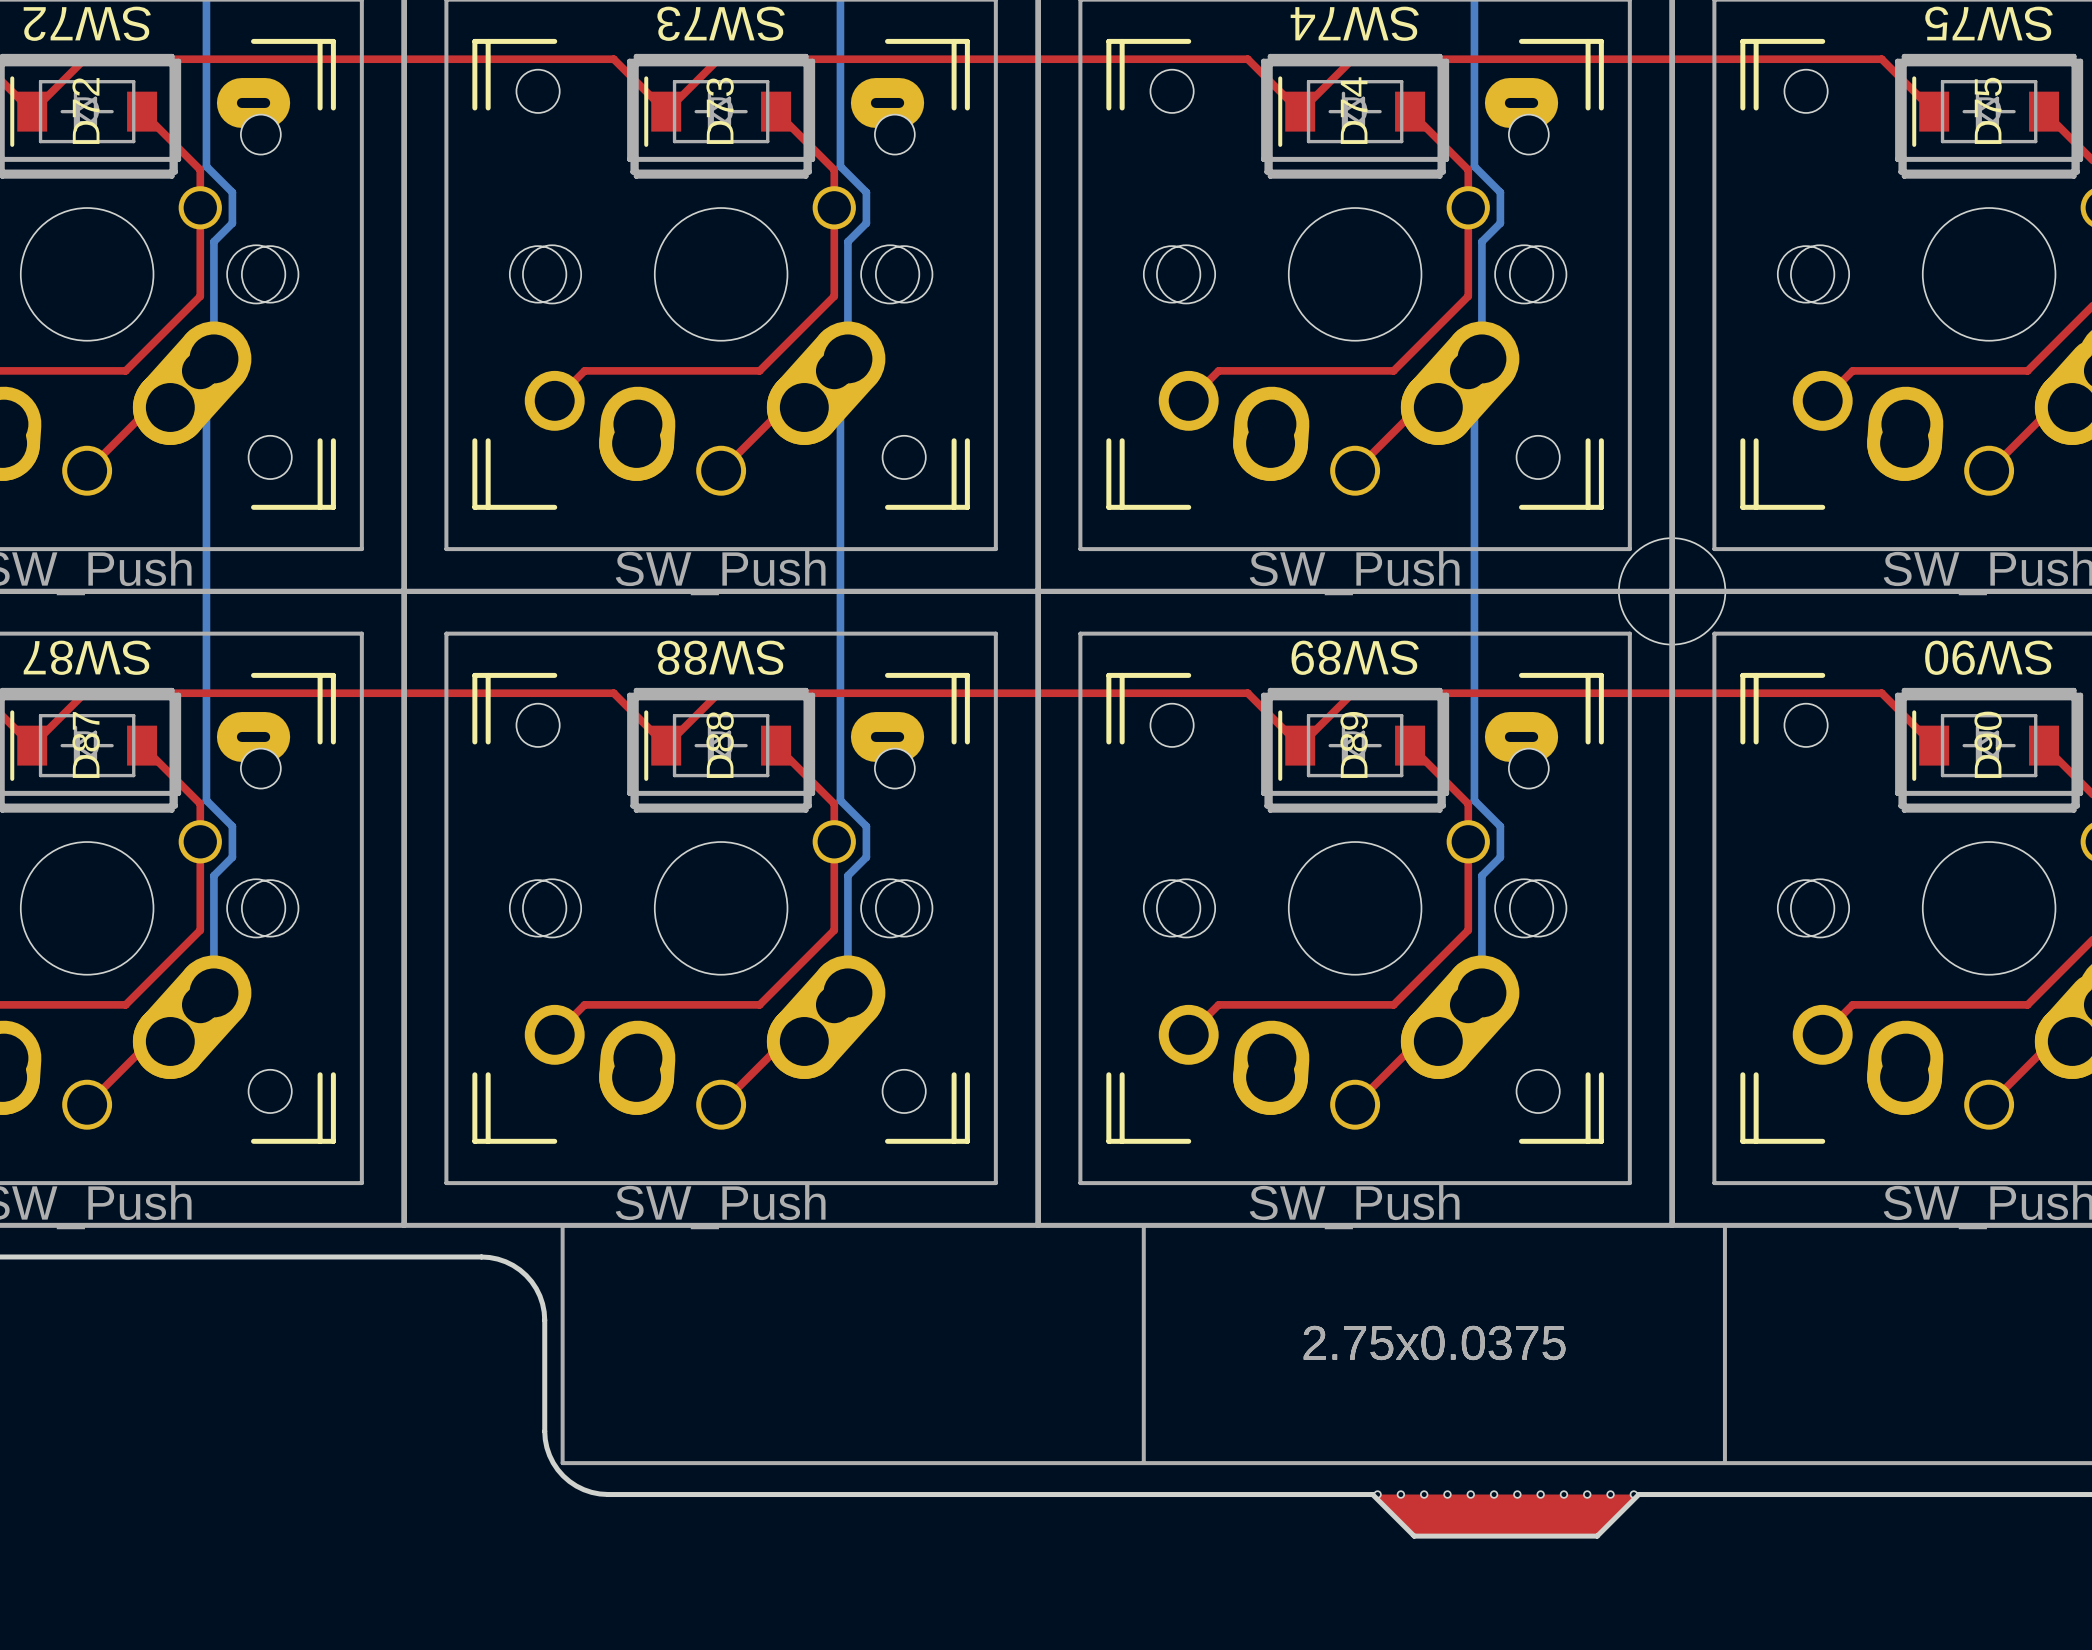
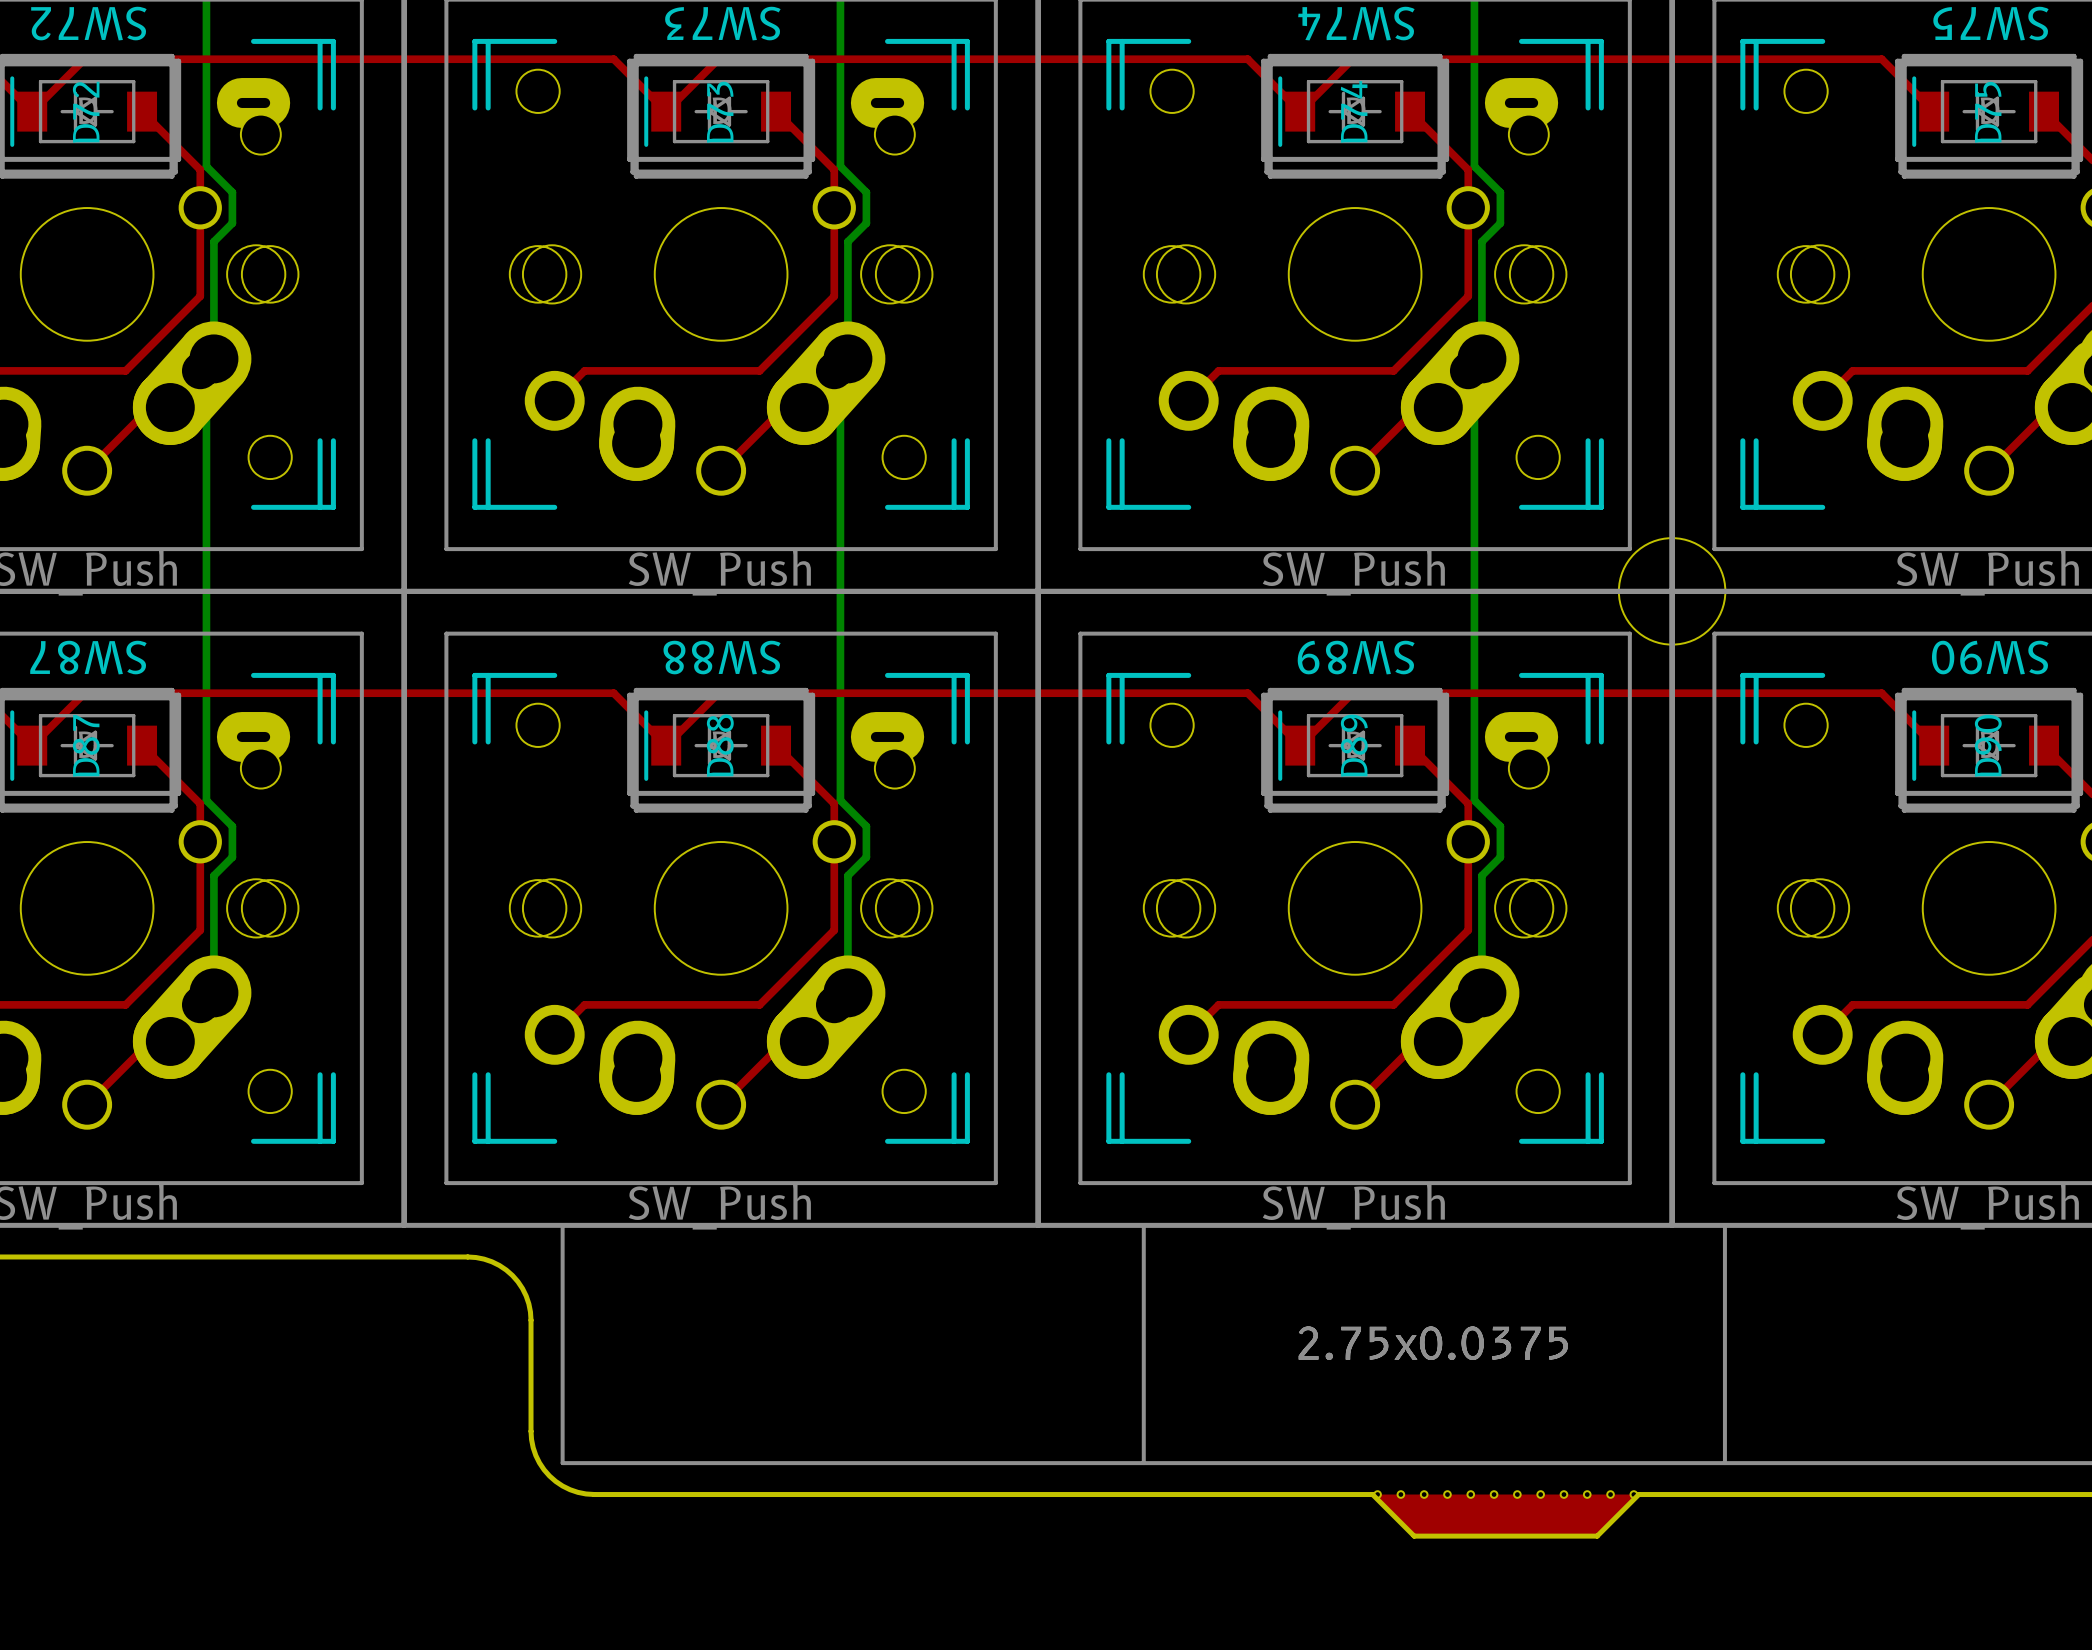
board edge: (467, 1256) (489, 1257) (505, 1261) (526, 1275) (536, 1288) (544, 1311) (544, 1431) (549, 1455) (557, 1469) (569, 1481) (591, 1492) (607, 1494) -> (467, 1256) (484, 1259) (506, 1270) (517, 1281) (526, 1296) (531, 1320) (531, 1439) (539, 1462) (549, 1475) (570, 1489) (585, 1493) (607, 1494)

